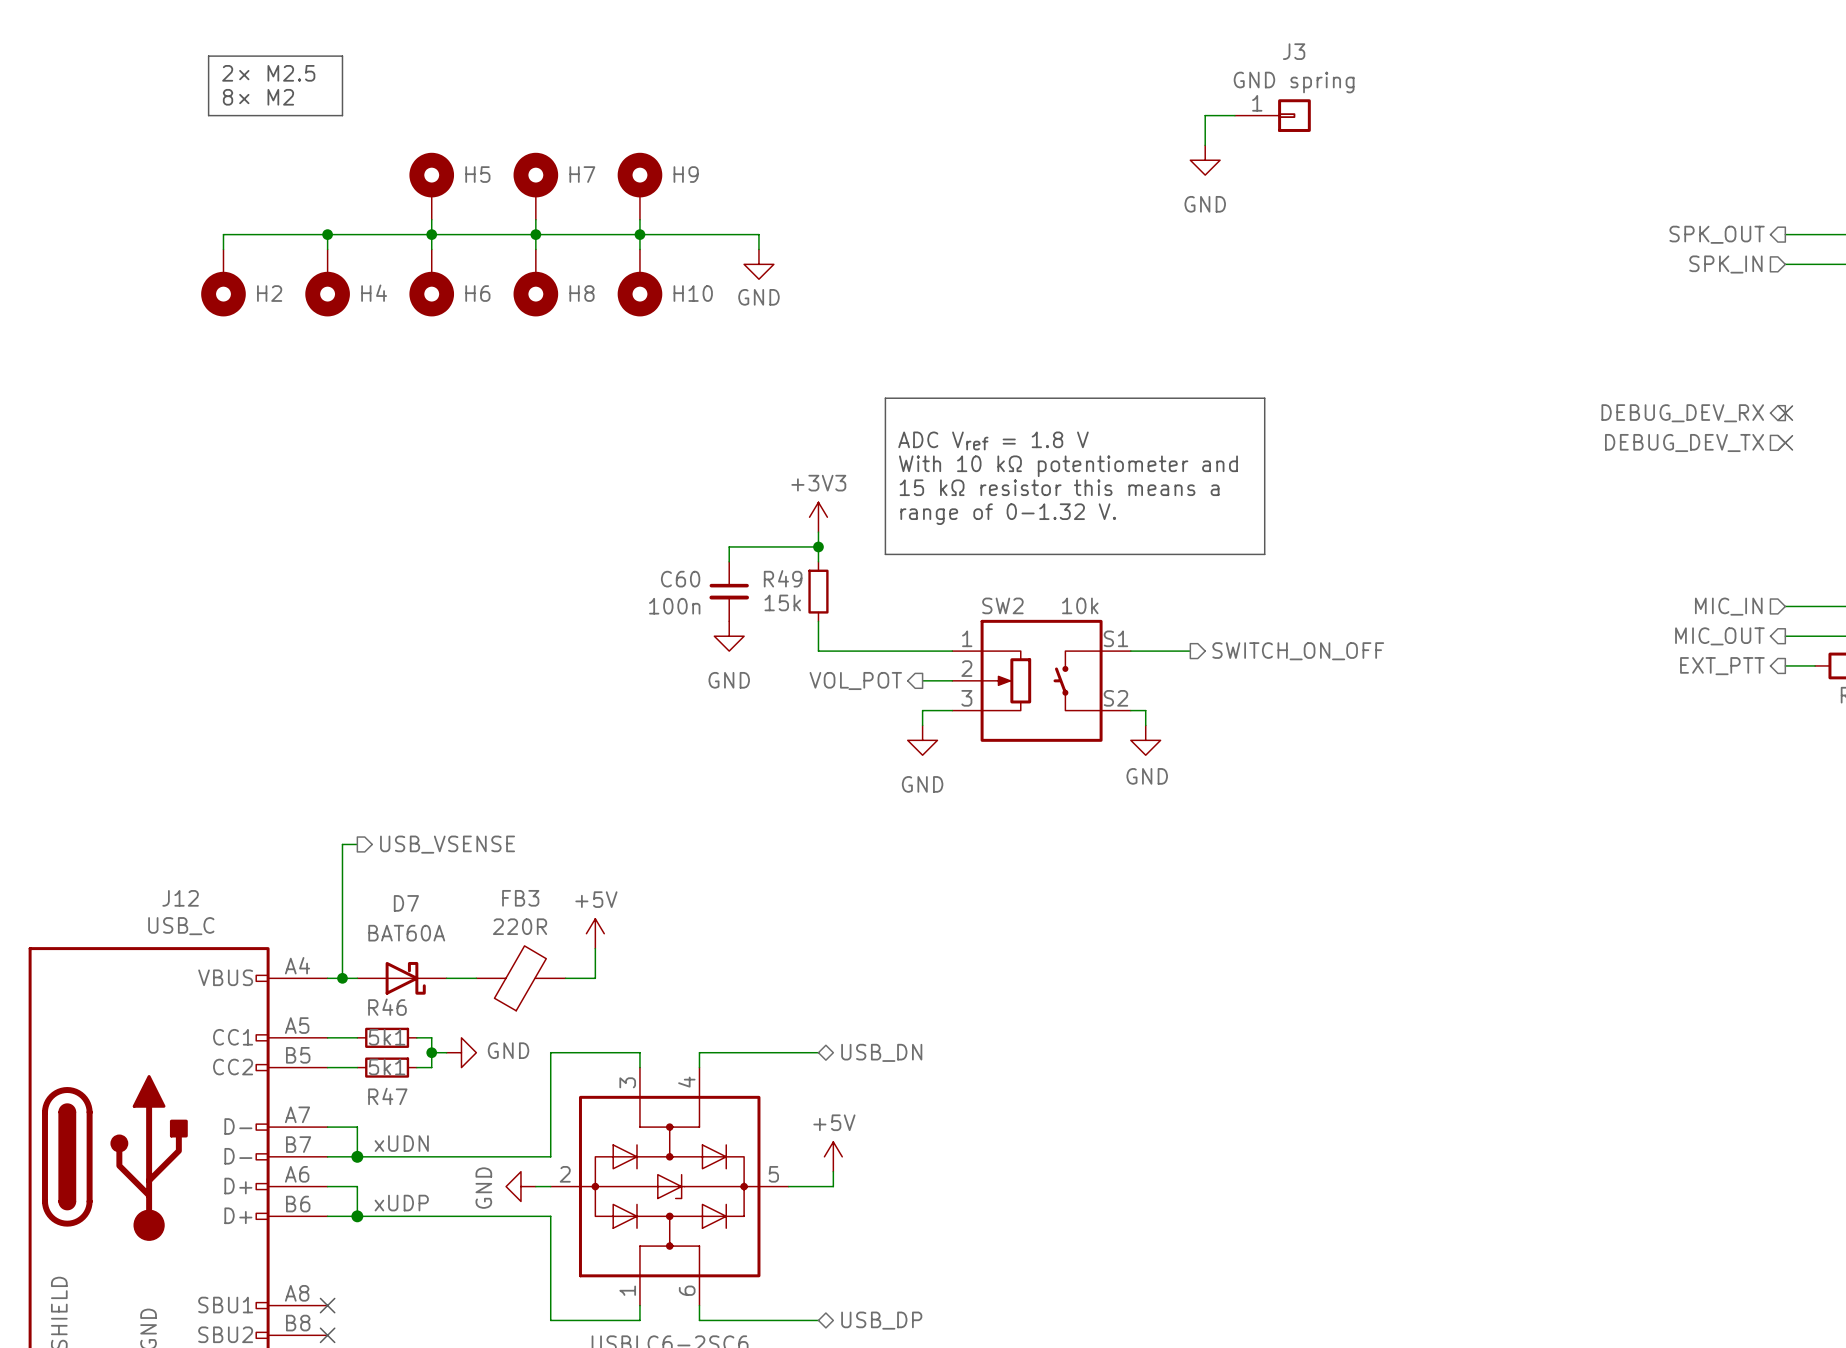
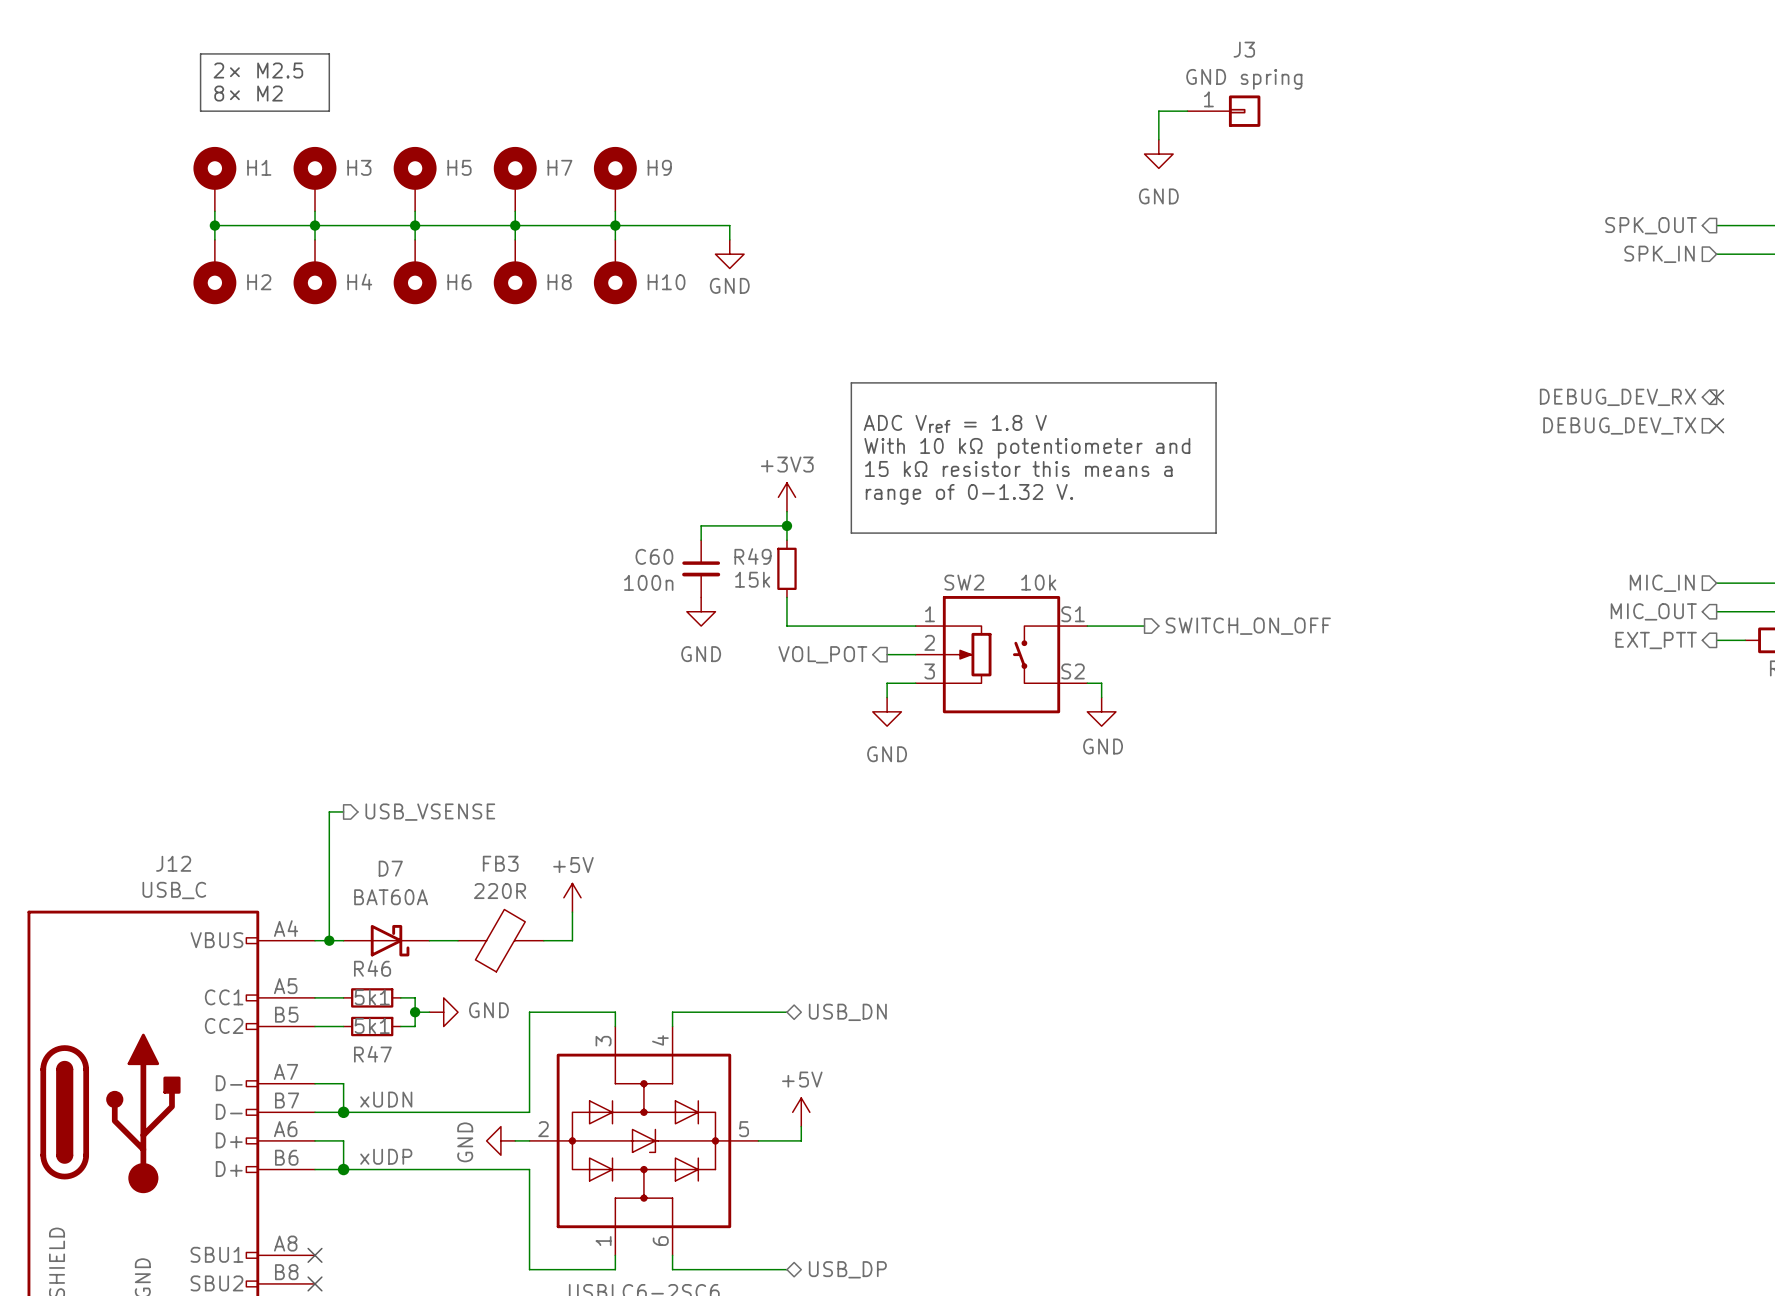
H1: none -> (214, 179)
H3: none -> (315, 179)
wire: none -> (214, 211) (214, 225)
wire: none -> (315, 211) (315, 225)
junction: none -> (214, 225)

